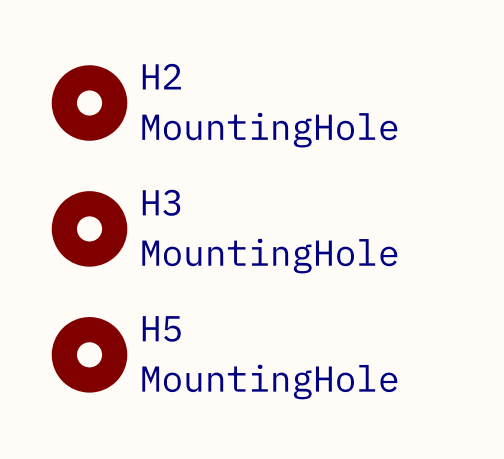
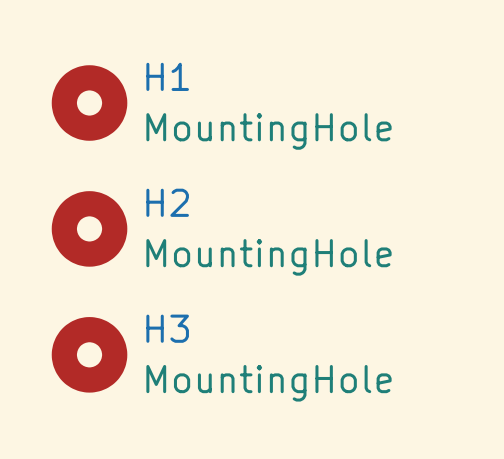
H2 name: H2 (161, 76) -> H1 (167, 76)
H3 name: H3 (161, 202) -> H2 (167, 202)
H5 name: H5 (161, 328) -> H3 (167, 328)

